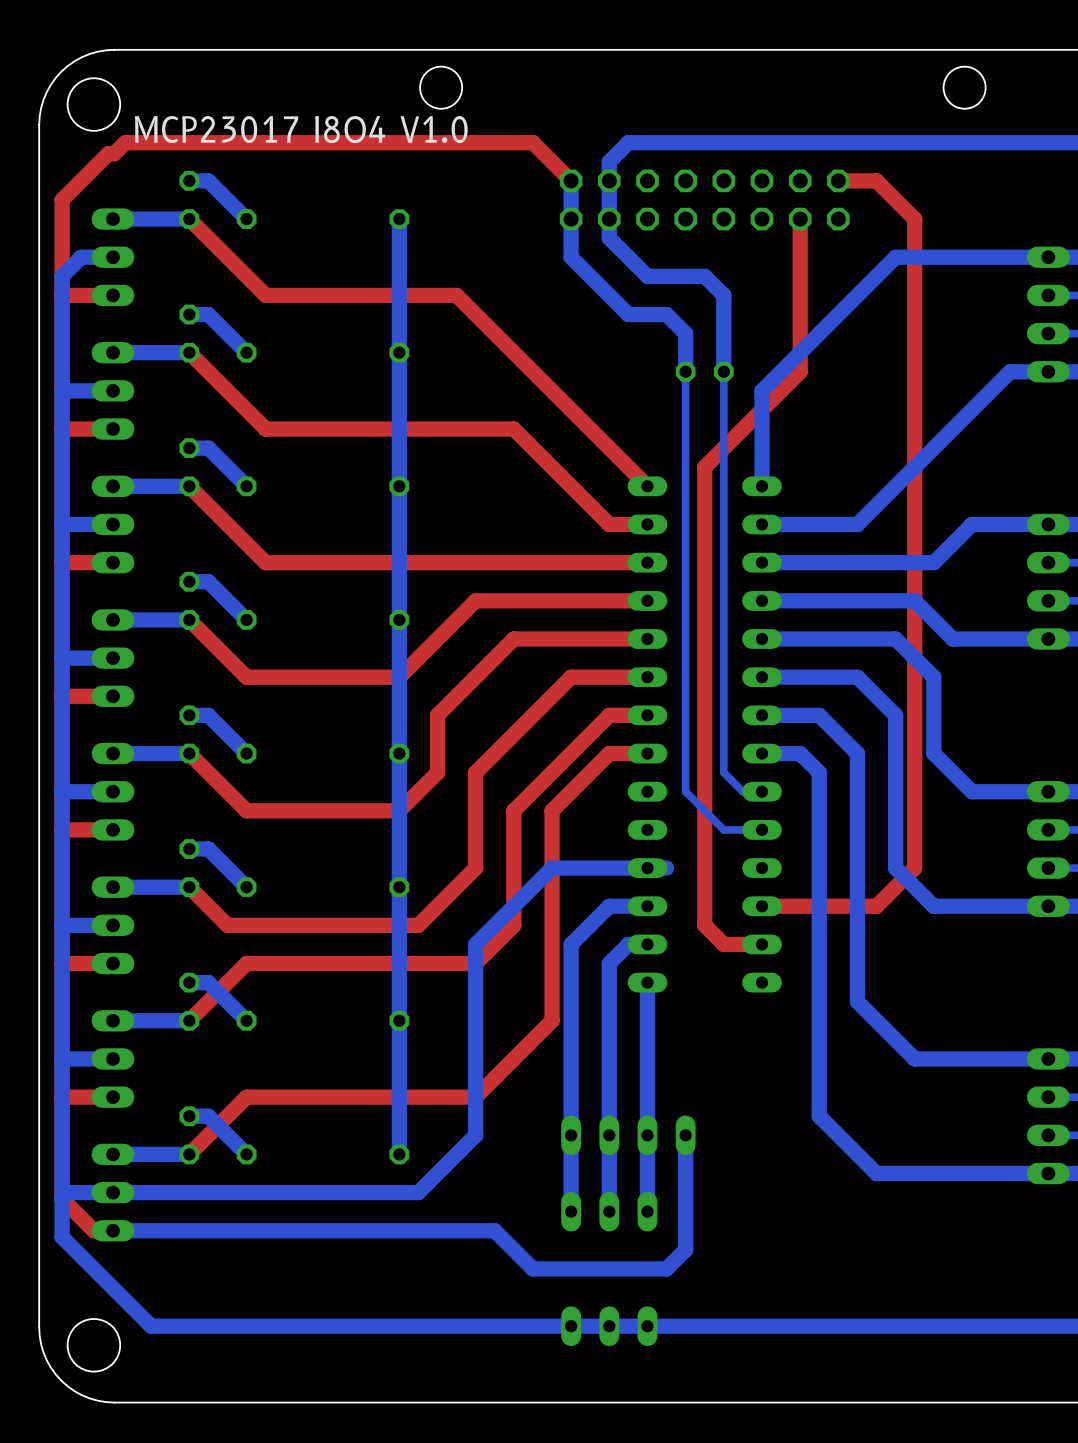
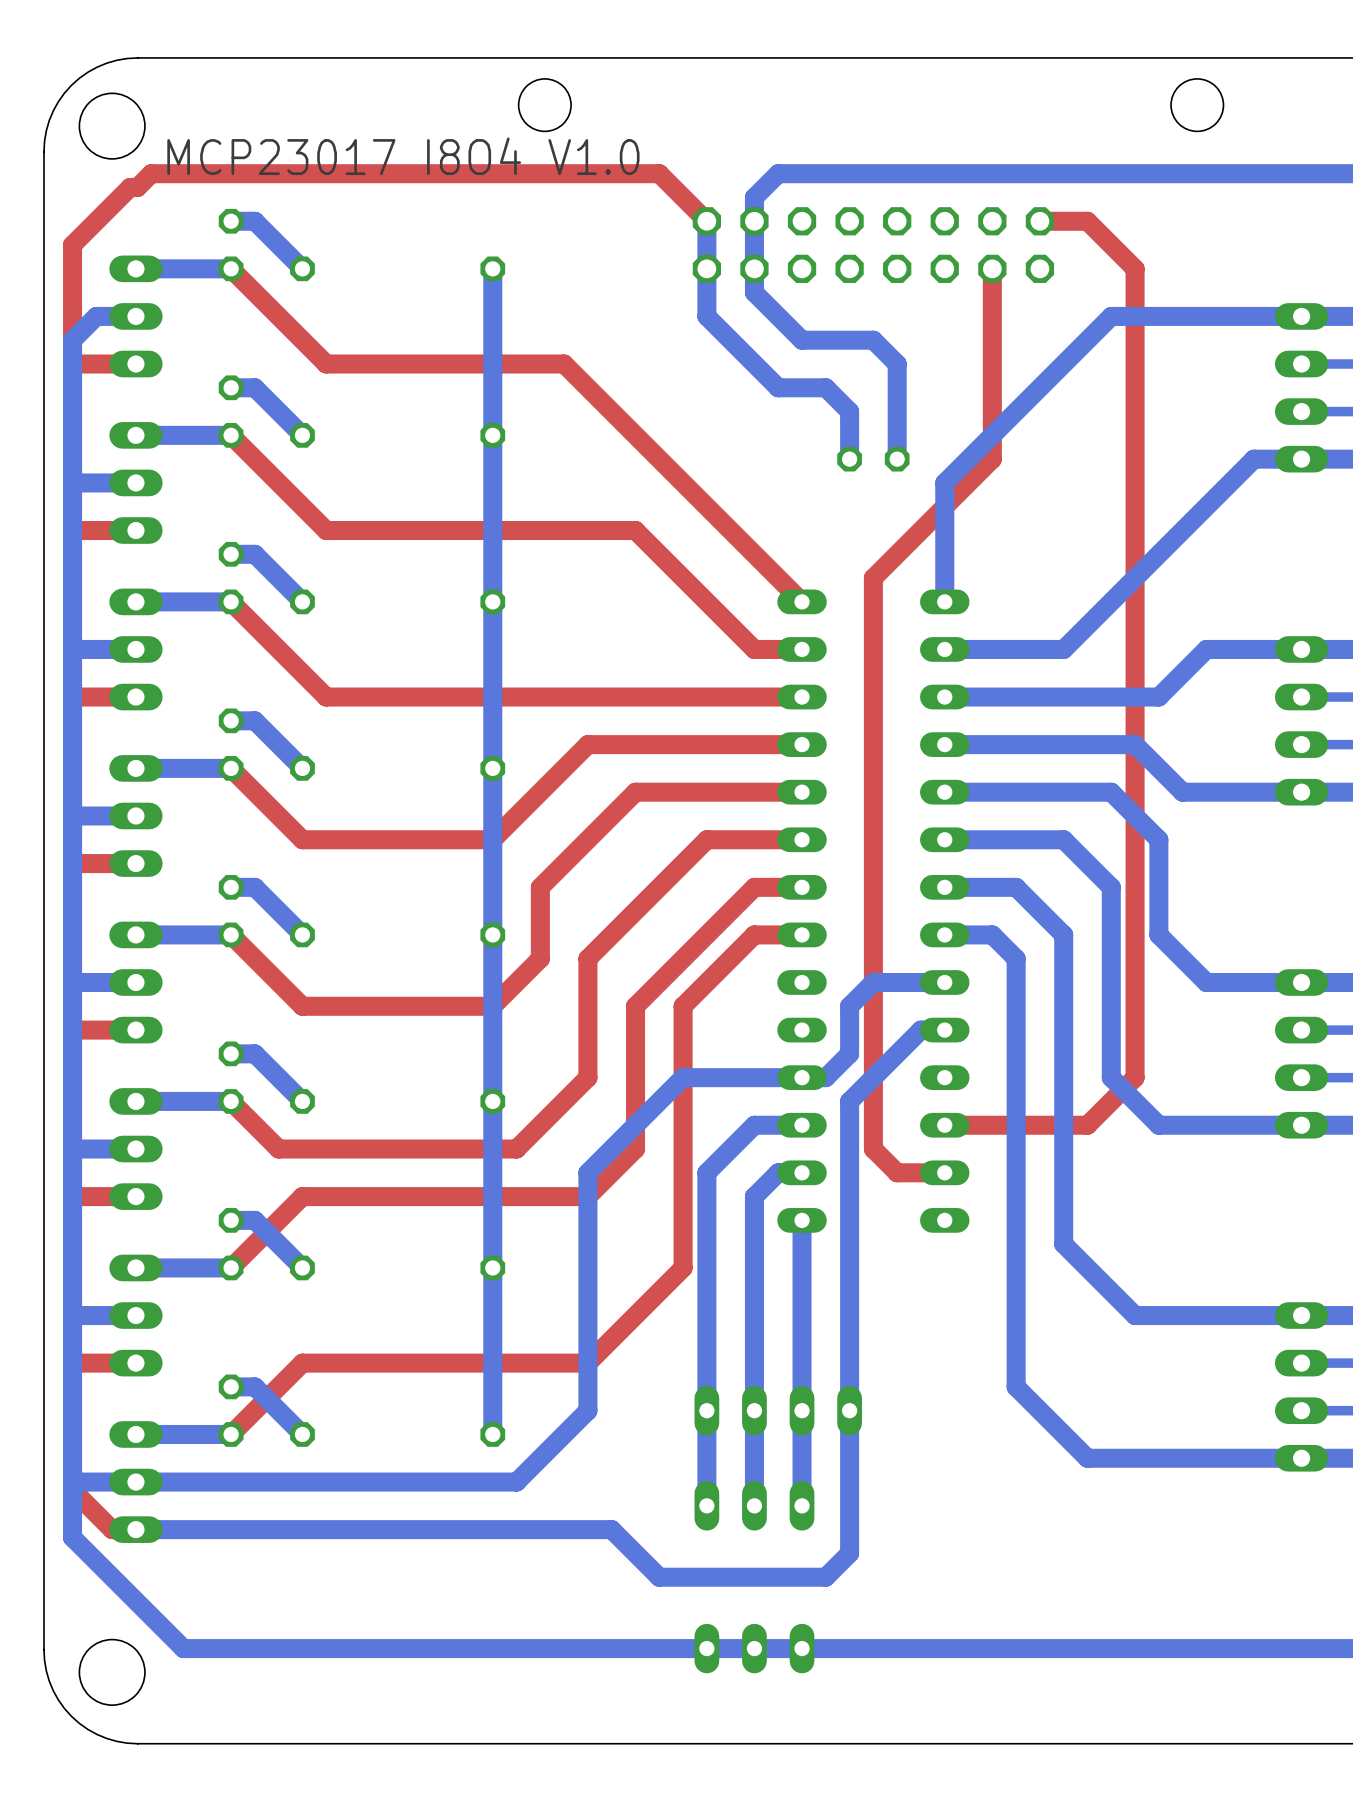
bottom track: (685, 371) (685, 791) (723, 829) (742, 829) -> (849, 1410) (849, 1101) (920, 1030)
bottom track: (723, 371) (723, 772) (742, 791) -> (825, 1077) (849, 1053) (849, 1006) (873, 982) (920, 982)

